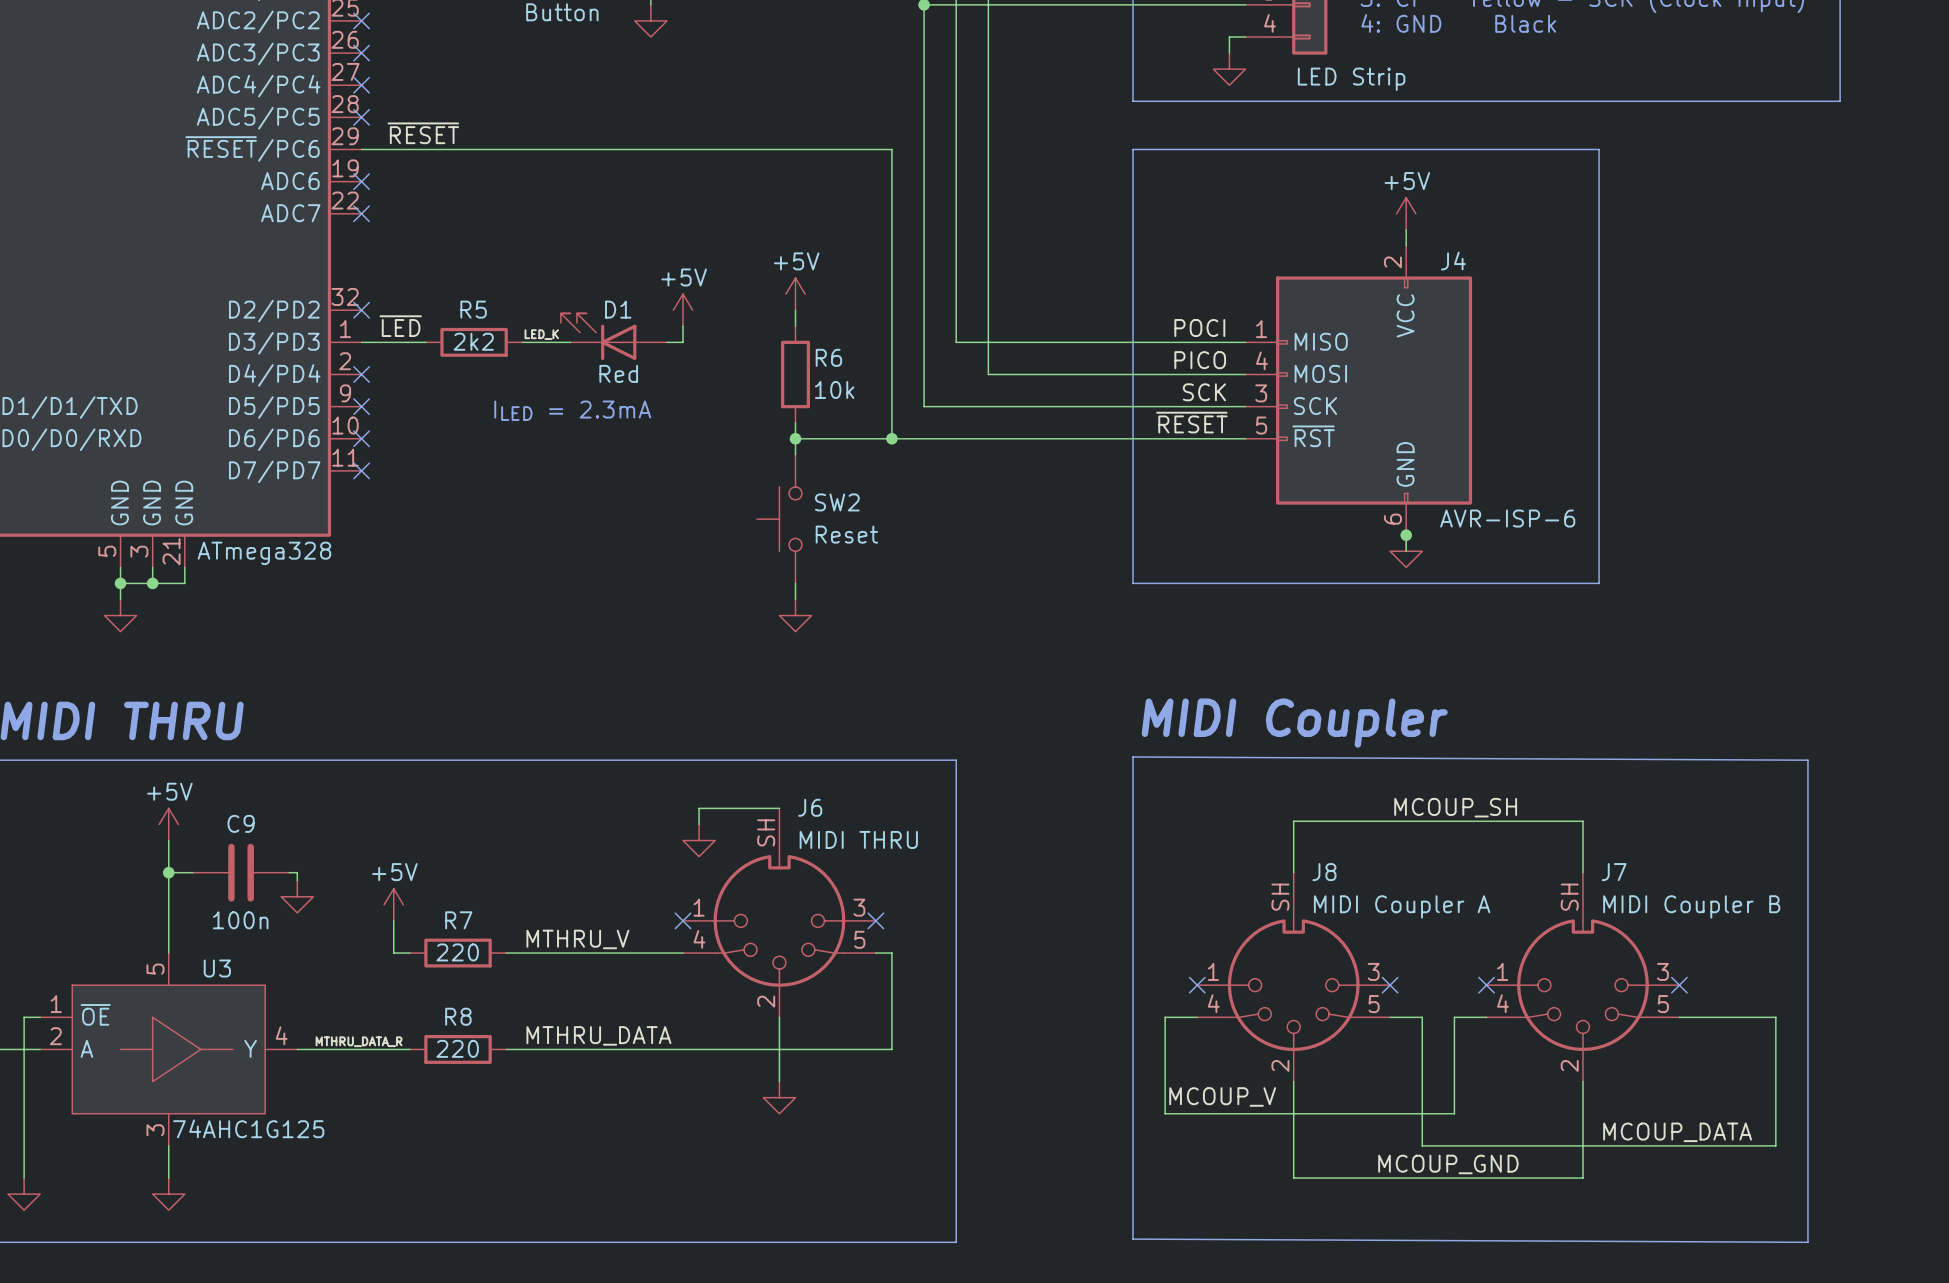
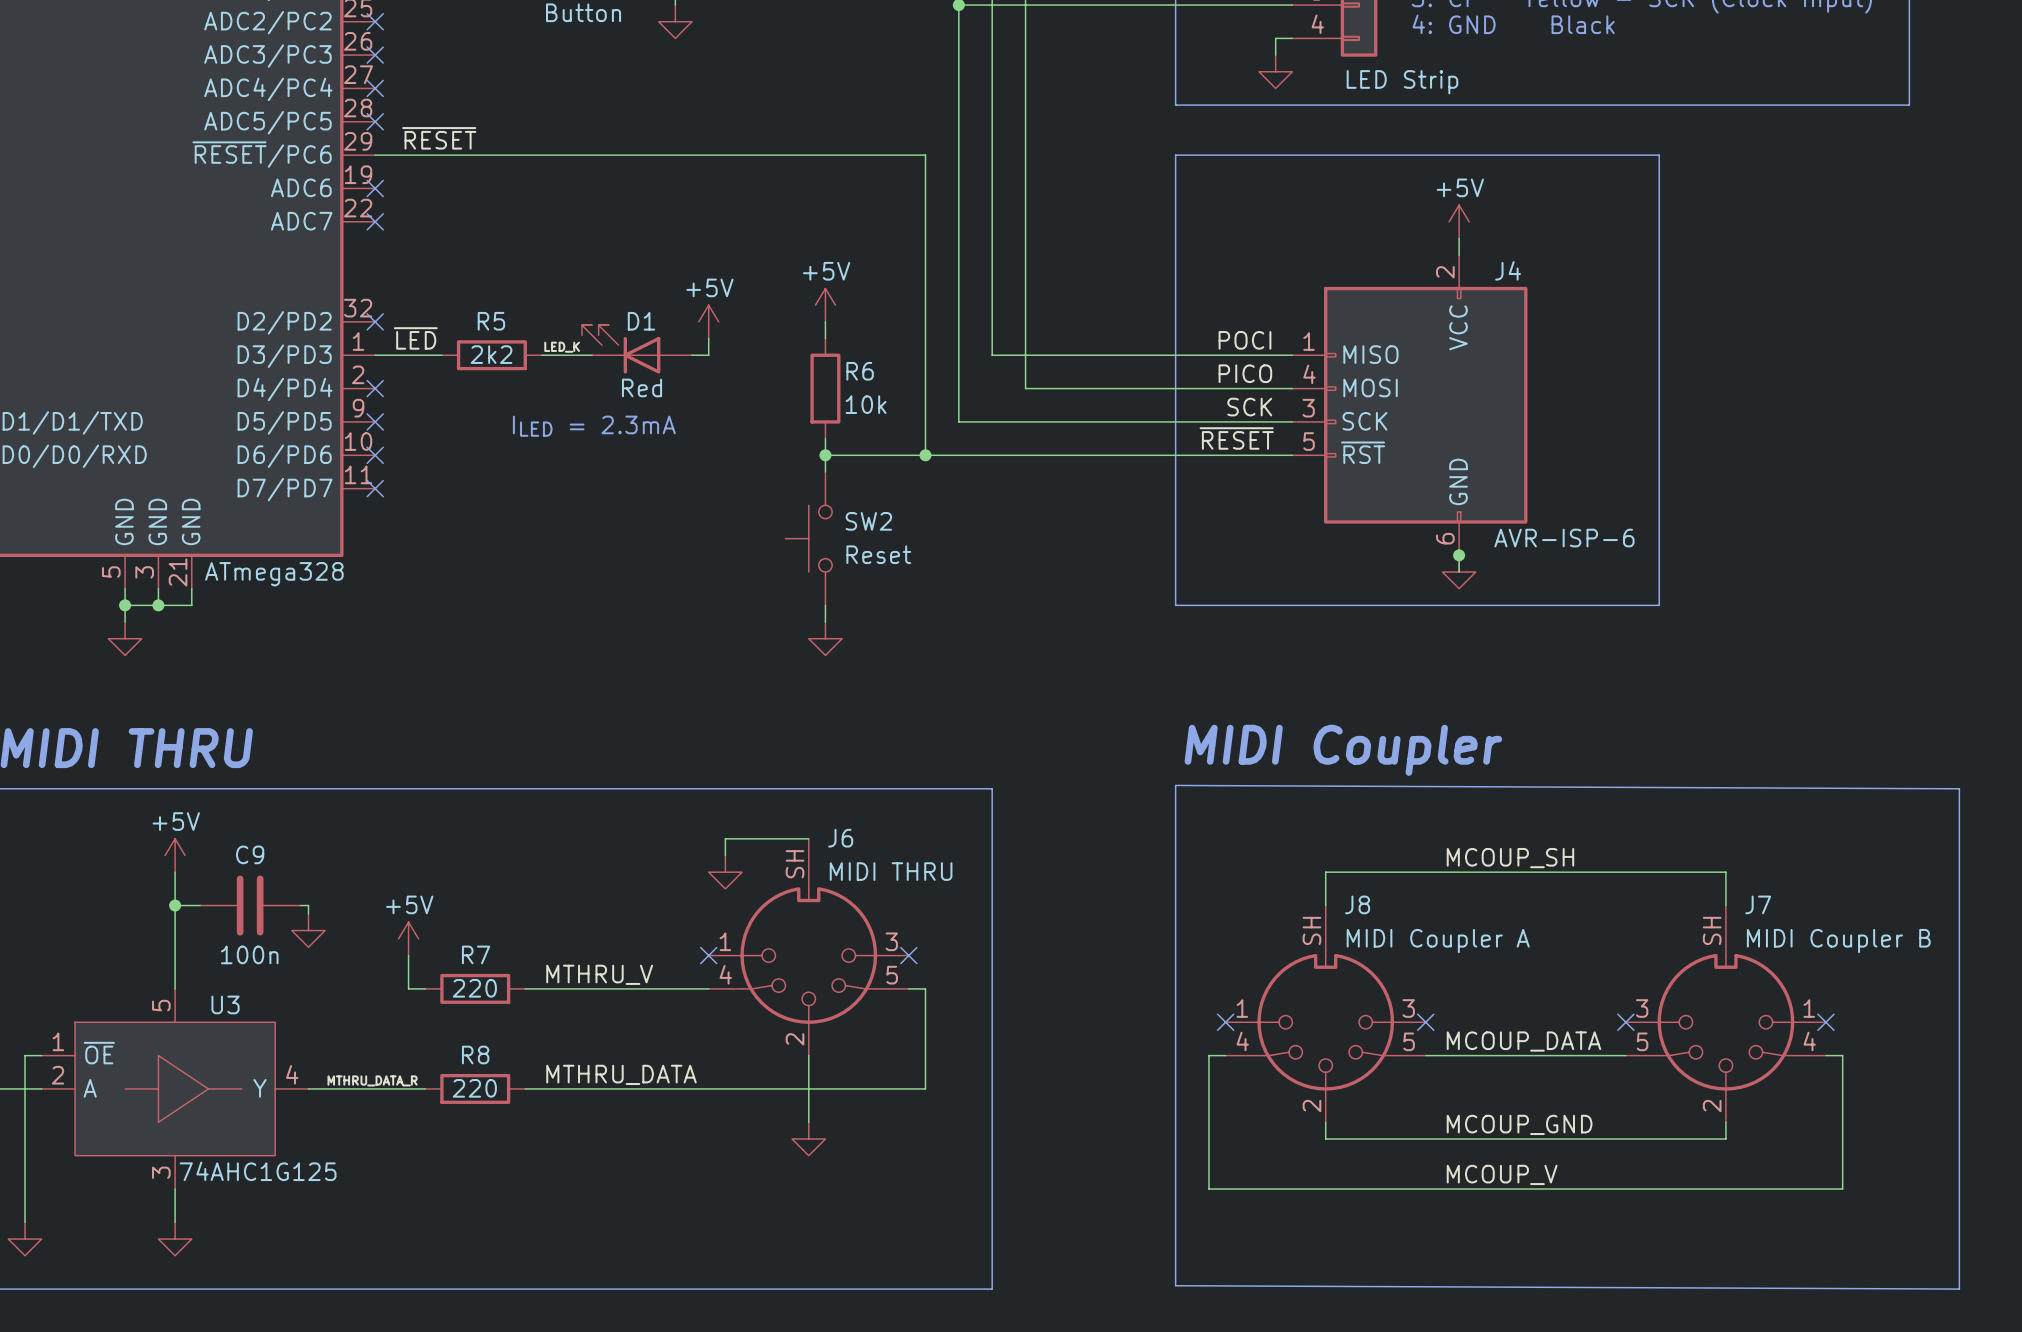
line: (1132, 756) (1807, 760) (1807, 1242) (1132, 1239) -> (1175, 785) (1959, 788) (1959, 1289) (1175, 1285)
label position: MCOUP_SH (1455, 807) -> MCOUP_SH (1510, 858)
wire: none -> (1325, 905) (1325, 872) (1725, 872) (1725, 905)
wire: (1293, 872) (1293, 821) (1582, 821) (1582, 872) -> none
J8 position: (1293, 977) -> (1325, 1013)
no-connect mark position: (1197, 985) -> (1225, 1022)
no-connect mark position: (1390, 985) -> (1425, 1022)
no-connect mark: (1486, 985) -> none
no-connect mark: none -> (1625, 1022)
J7 flip: as is (1582, 985) -> left-right (1725, 1022)
no-connect mark: (1679, 985) -> none
no-connect mark: none -> (1825, 1022)
wire: (1422, 1017) (1422, 1145) -> (1475, 1055) (1509, 1055)
wire: (1454, 1017) (1454, 1113) (1165, 1113) -> (1475, 1189) (1208, 1189) (1208, 1155)
wire: none -> (1325, 1122) (1325, 1138) (1725, 1138) (1725, 1122)
wire: (1293, 1081) (1293, 1178) (1582, 1178) (1582, 1081) -> none
label position: MCOUP_V (1222, 1096) -> MCOUP_V (1502, 1174)
label position: MCOUP_DATA (1677, 1132) -> MCOUP_DATA (1523, 1041)
label position: MCOUP_GND (1448, 1164) -> MCOUP_GND (1519, 1124)

